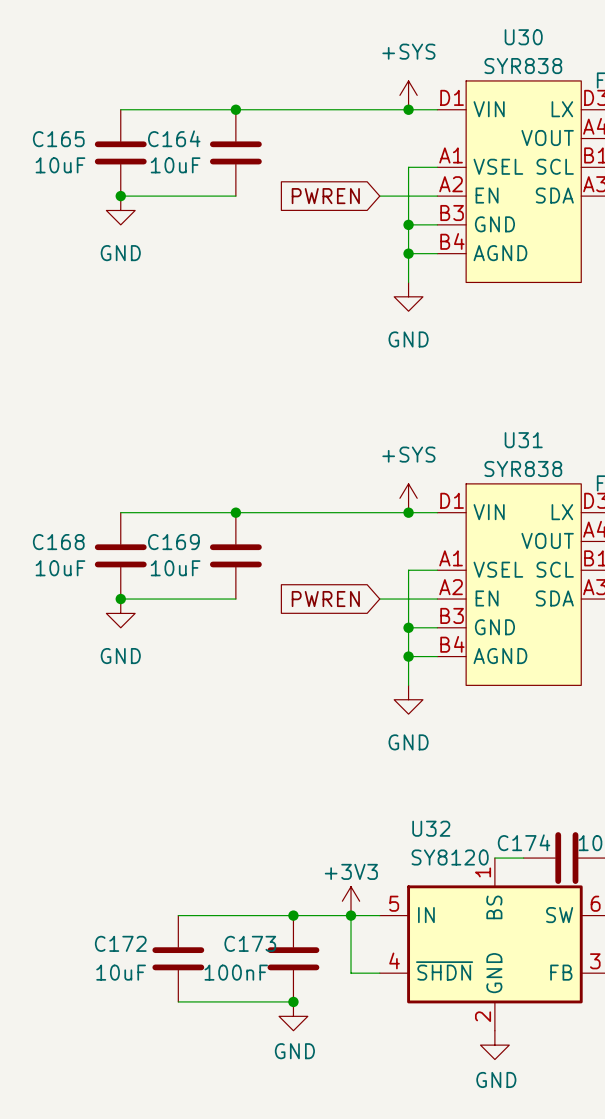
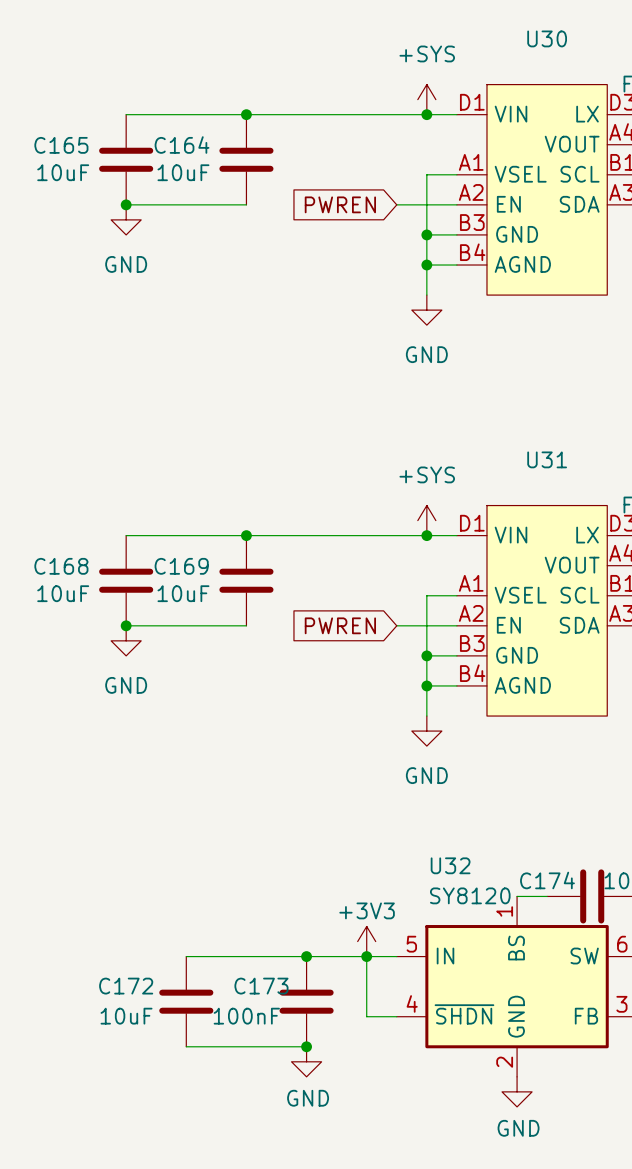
U30 value: SYR838 (523, 66) -> none
U31 value: SYR838 (523, 468) -> none

